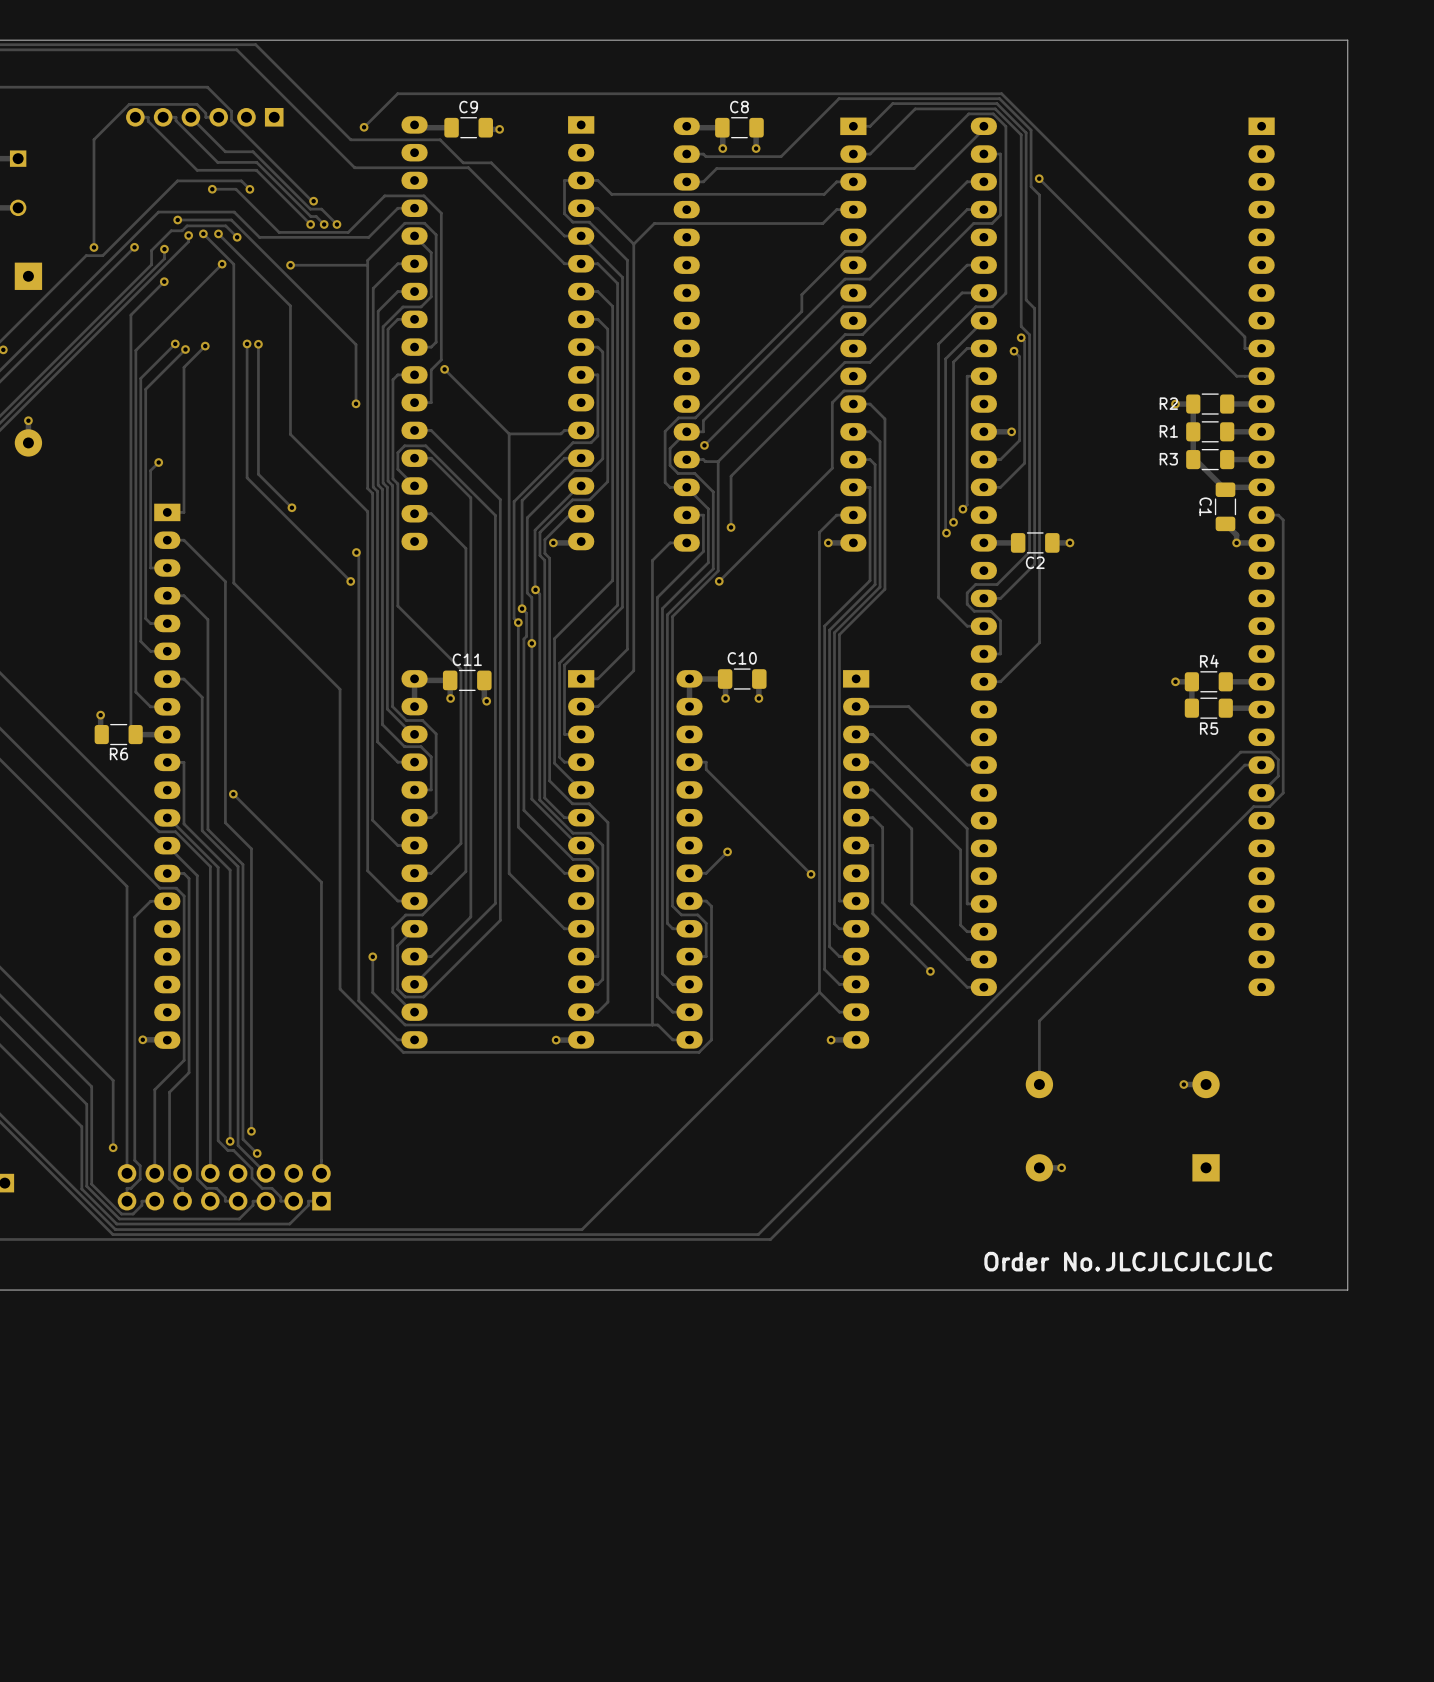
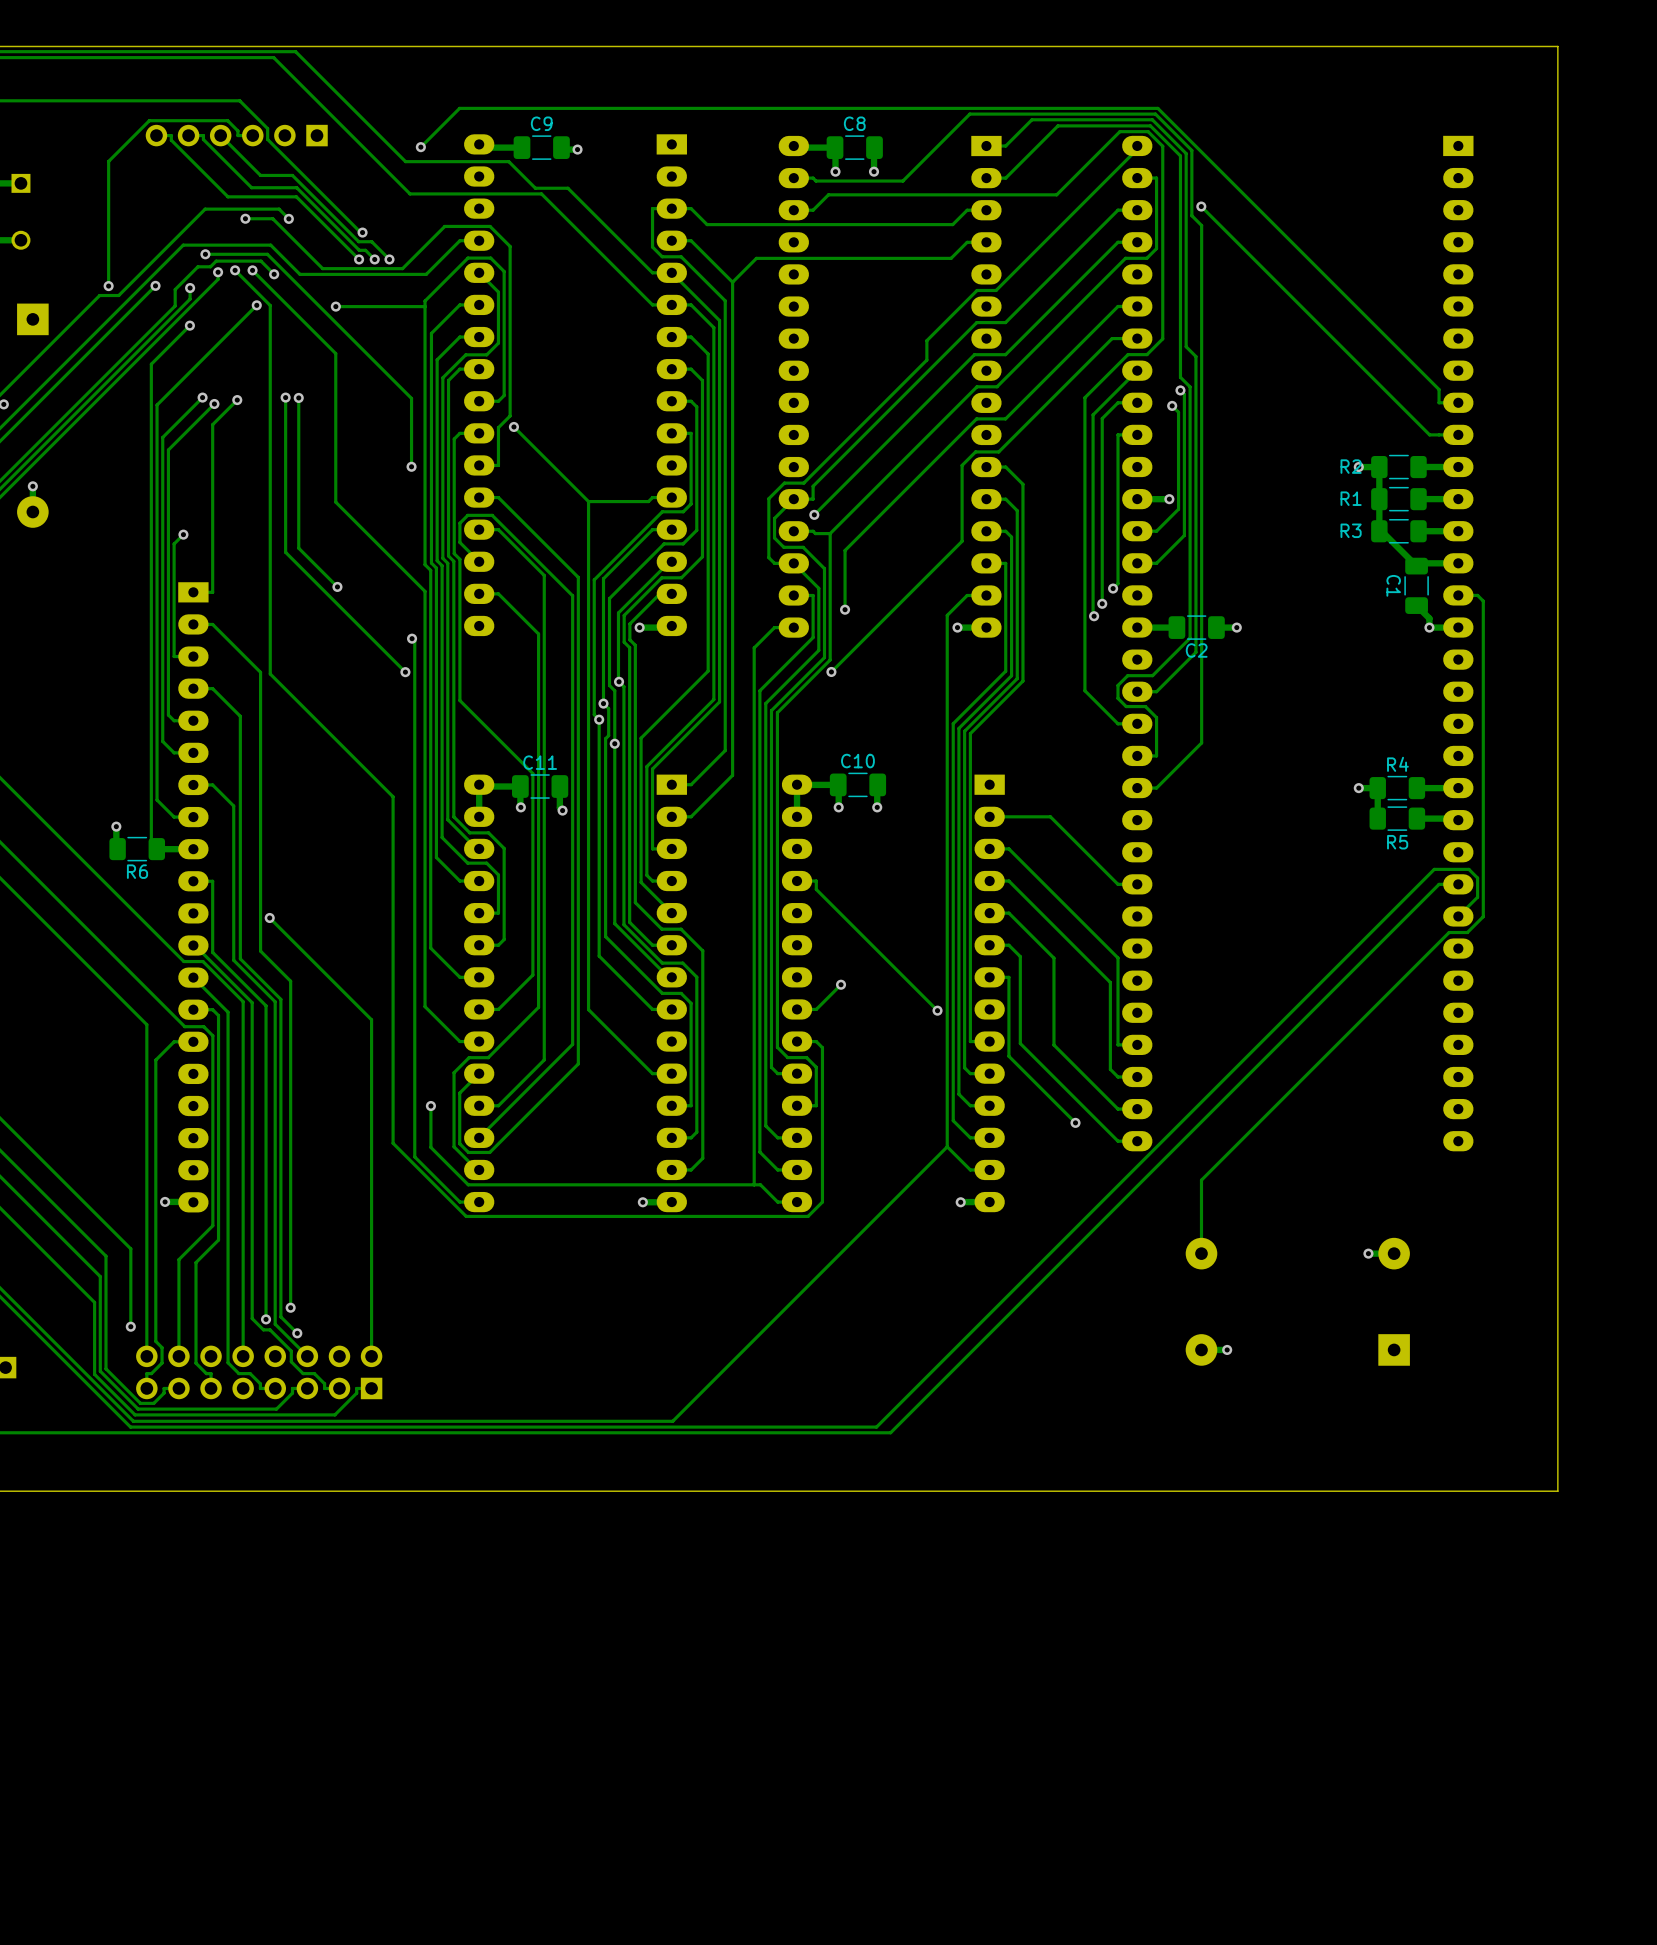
text: Order No. (1042, 1261) -> none
text: JLCJLCJLCJLC (1188, 1261) -> none

